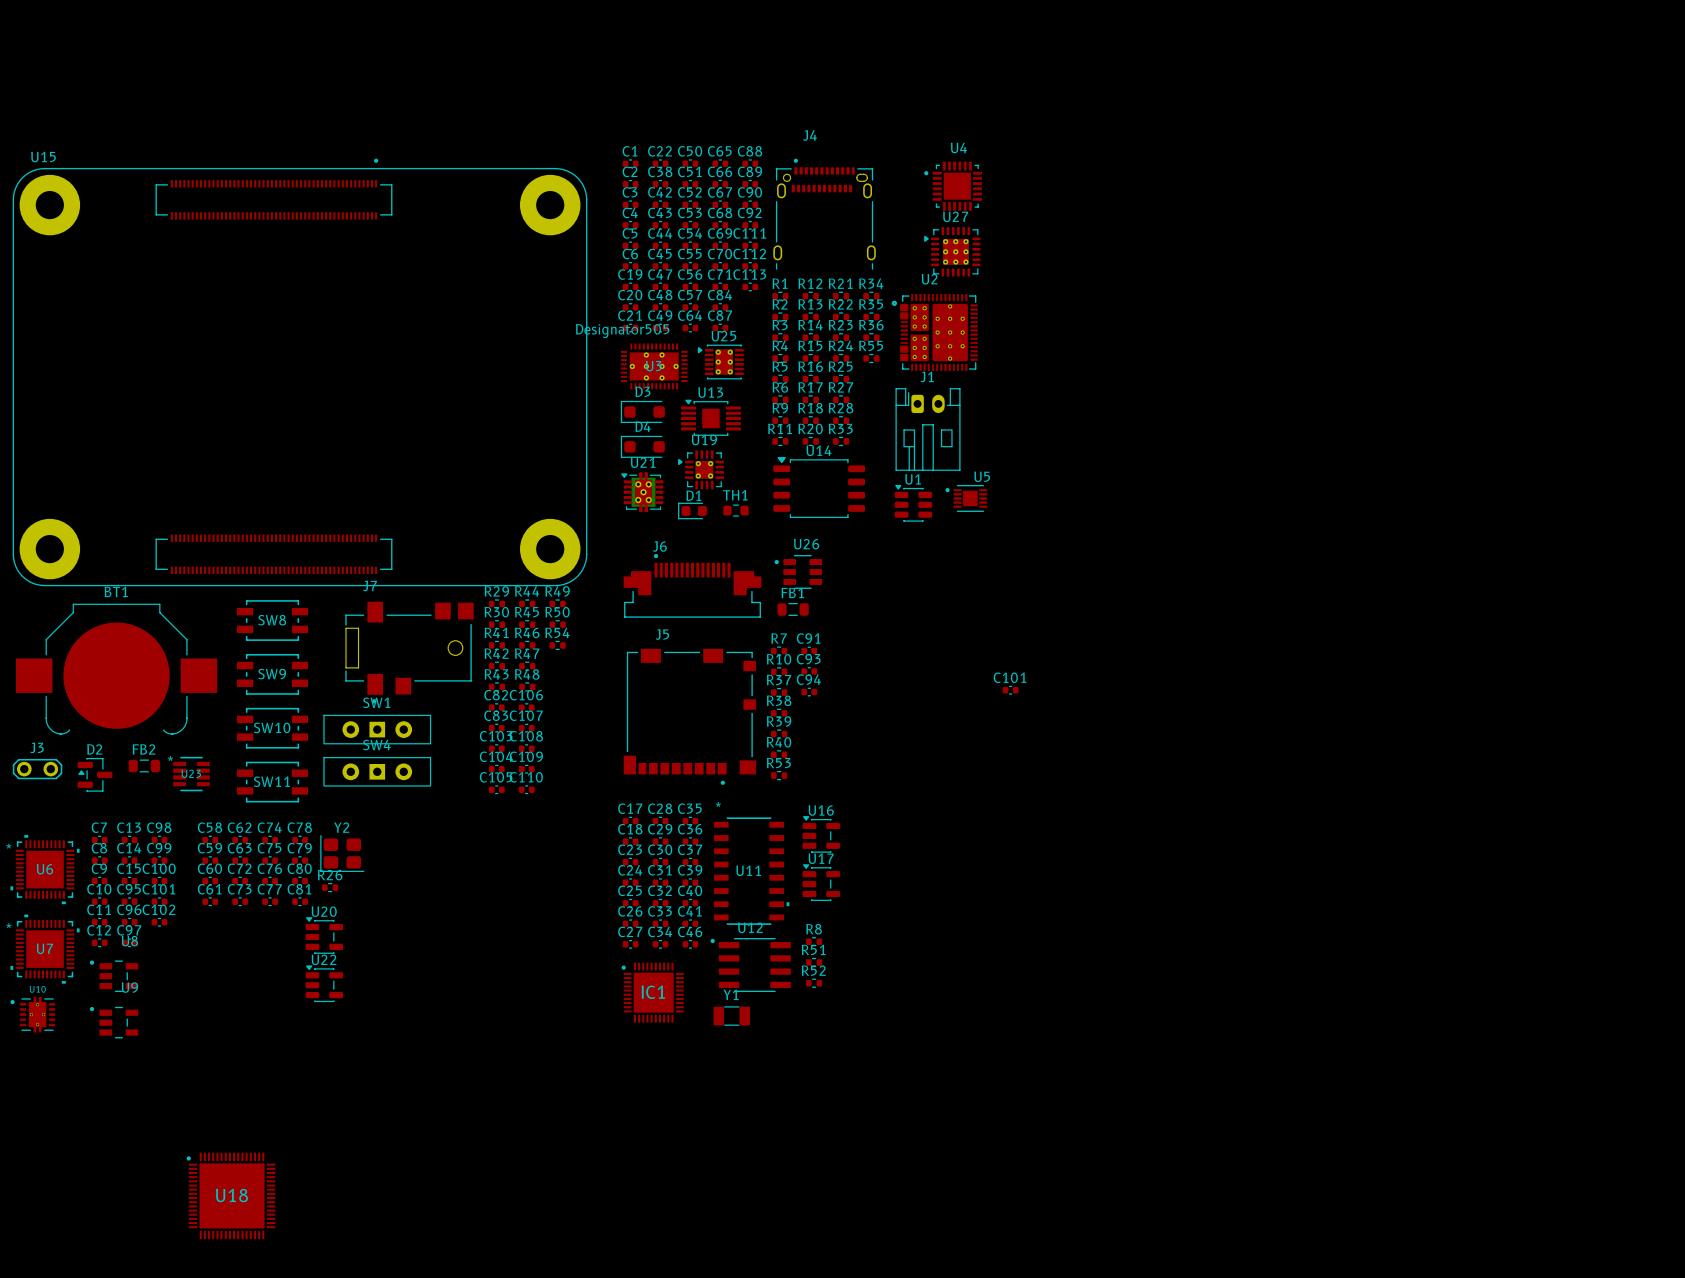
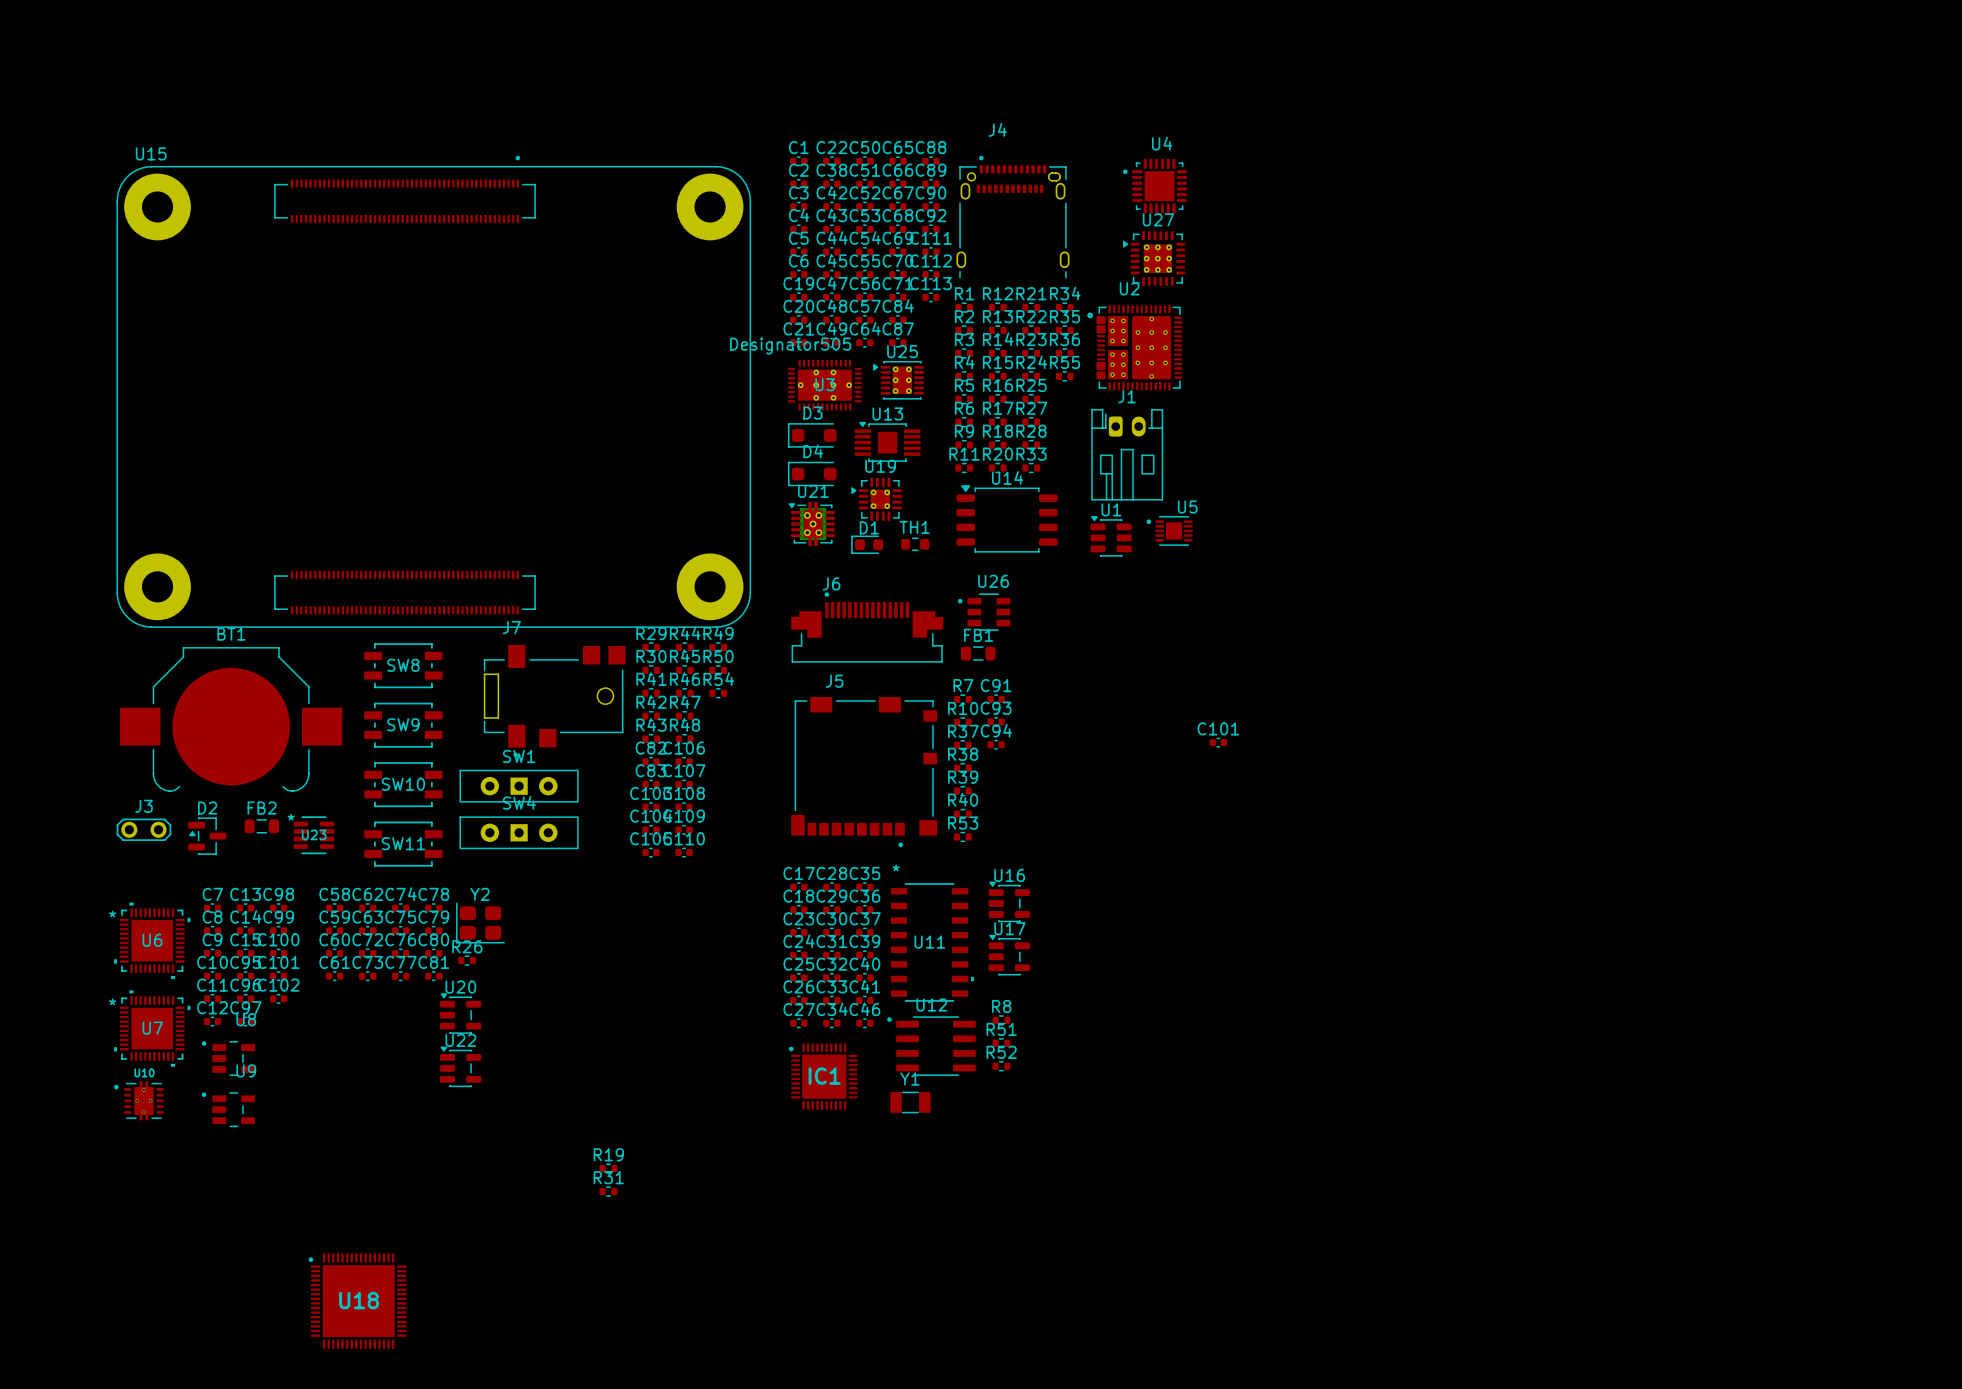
R19: none -> (608, 1168)
R31: none -> (608, 1191)

